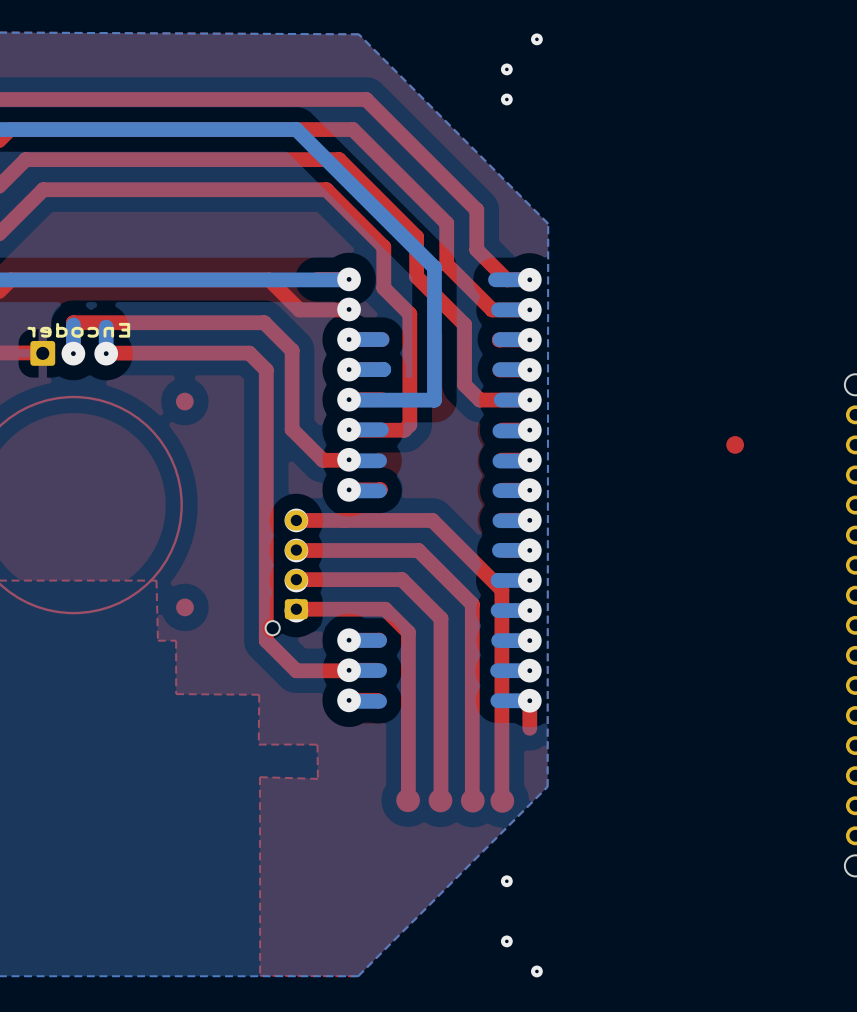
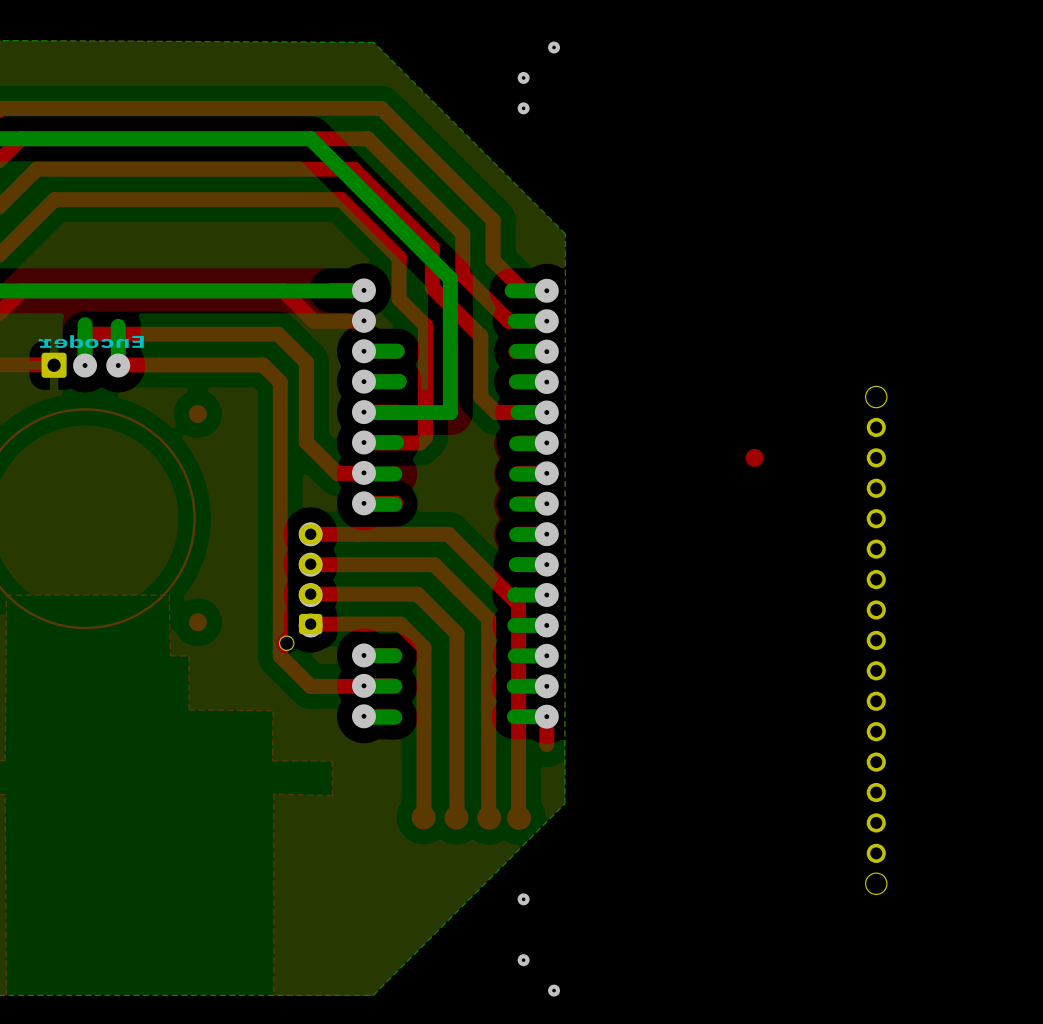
bottom track: none -> (85, 324) (85, 336)
bottom track: none -> (118, 326) (118, 338)

